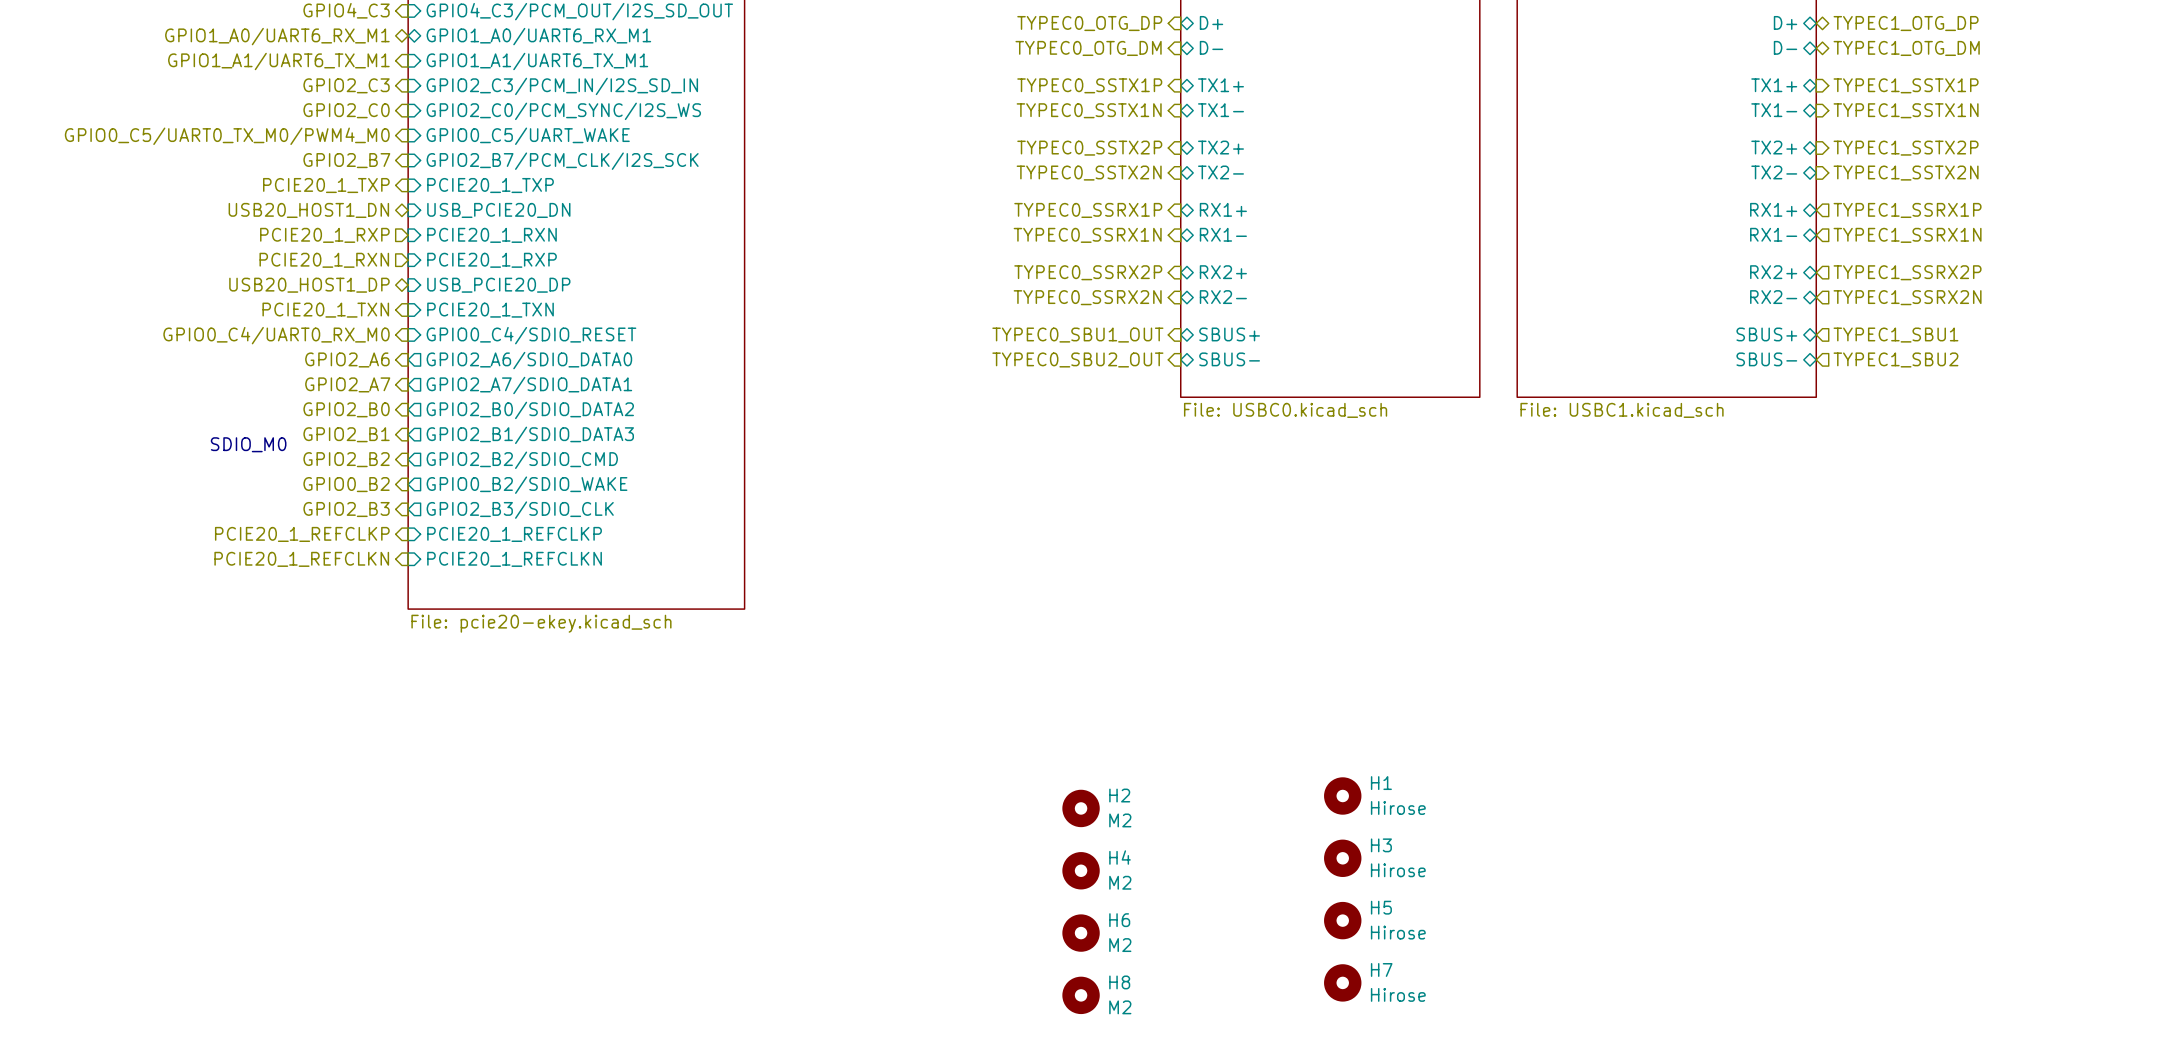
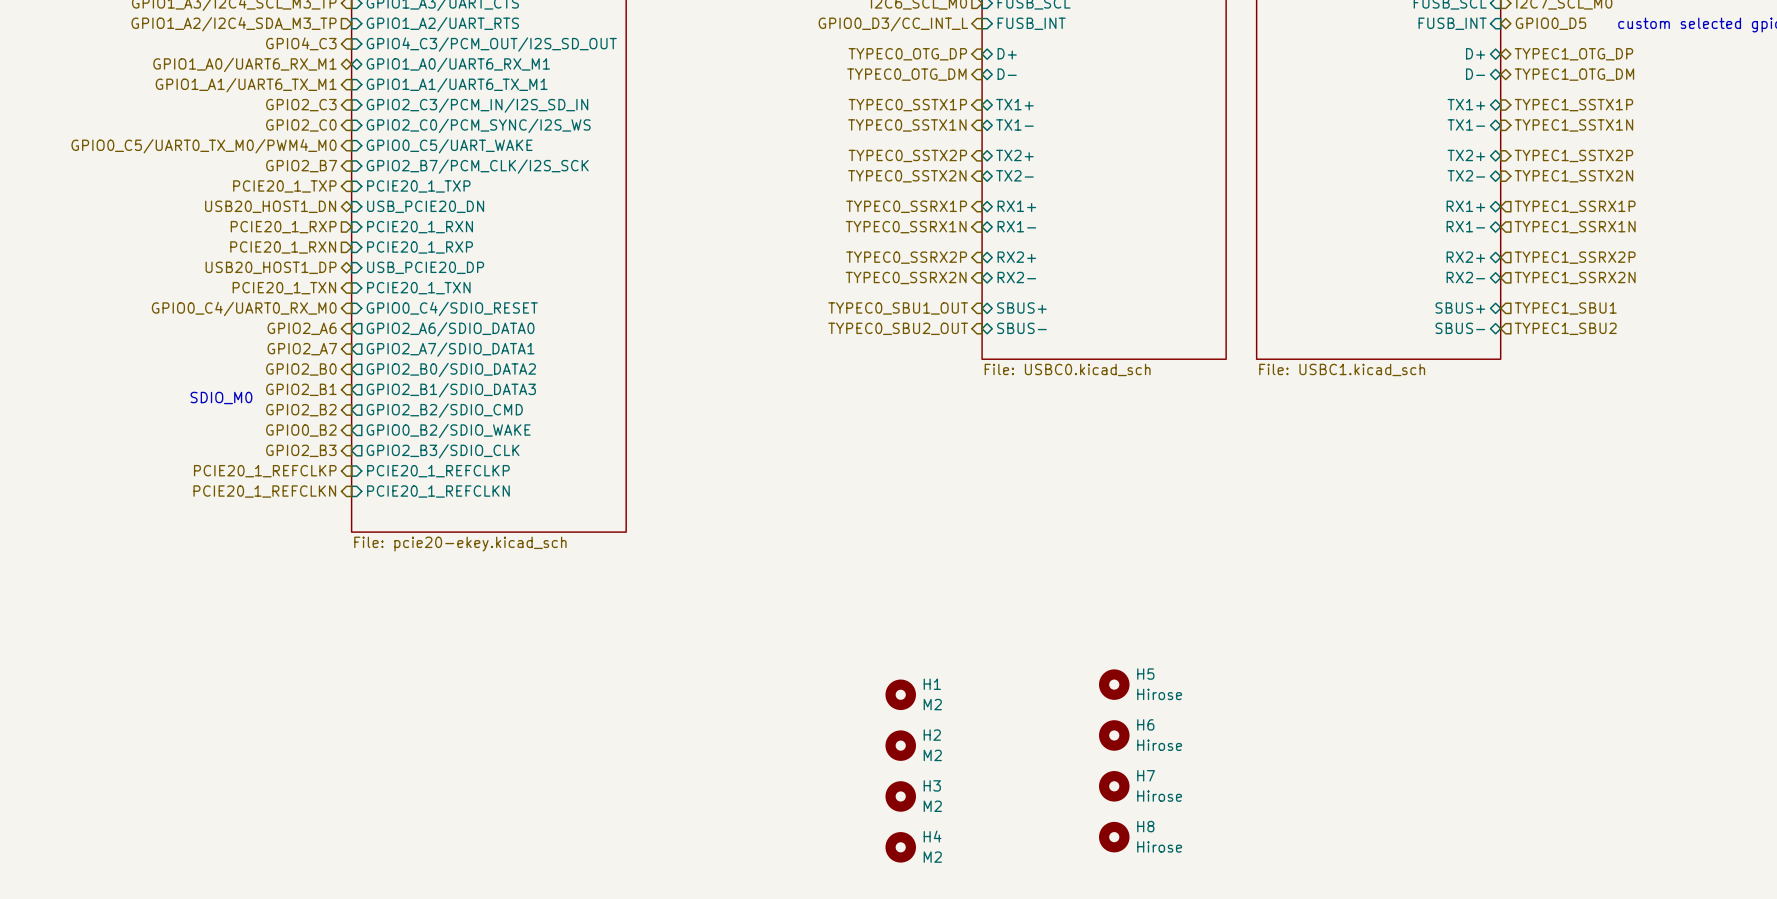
H1 name: H1 (1381, 783) -> H5 (1145, 674)
H2 name: H2 (1119, 795) -> H1 (932, 684)
H3 name: H3 (1381, 845) -> H6 (1145, 724)
H4 name: H4 (1120, 857) -> H2 (932, 735)
H5 name: H5 (1381, 907) -> H7 (1146, 775)
H6 name: H6 (1119, 920) -> H3 (932, 785)
H7 name: H7 (1381, 969) -> H8 (1145, 826)
H8 name: H8 (1119, 982) -> H4 (932, 836)

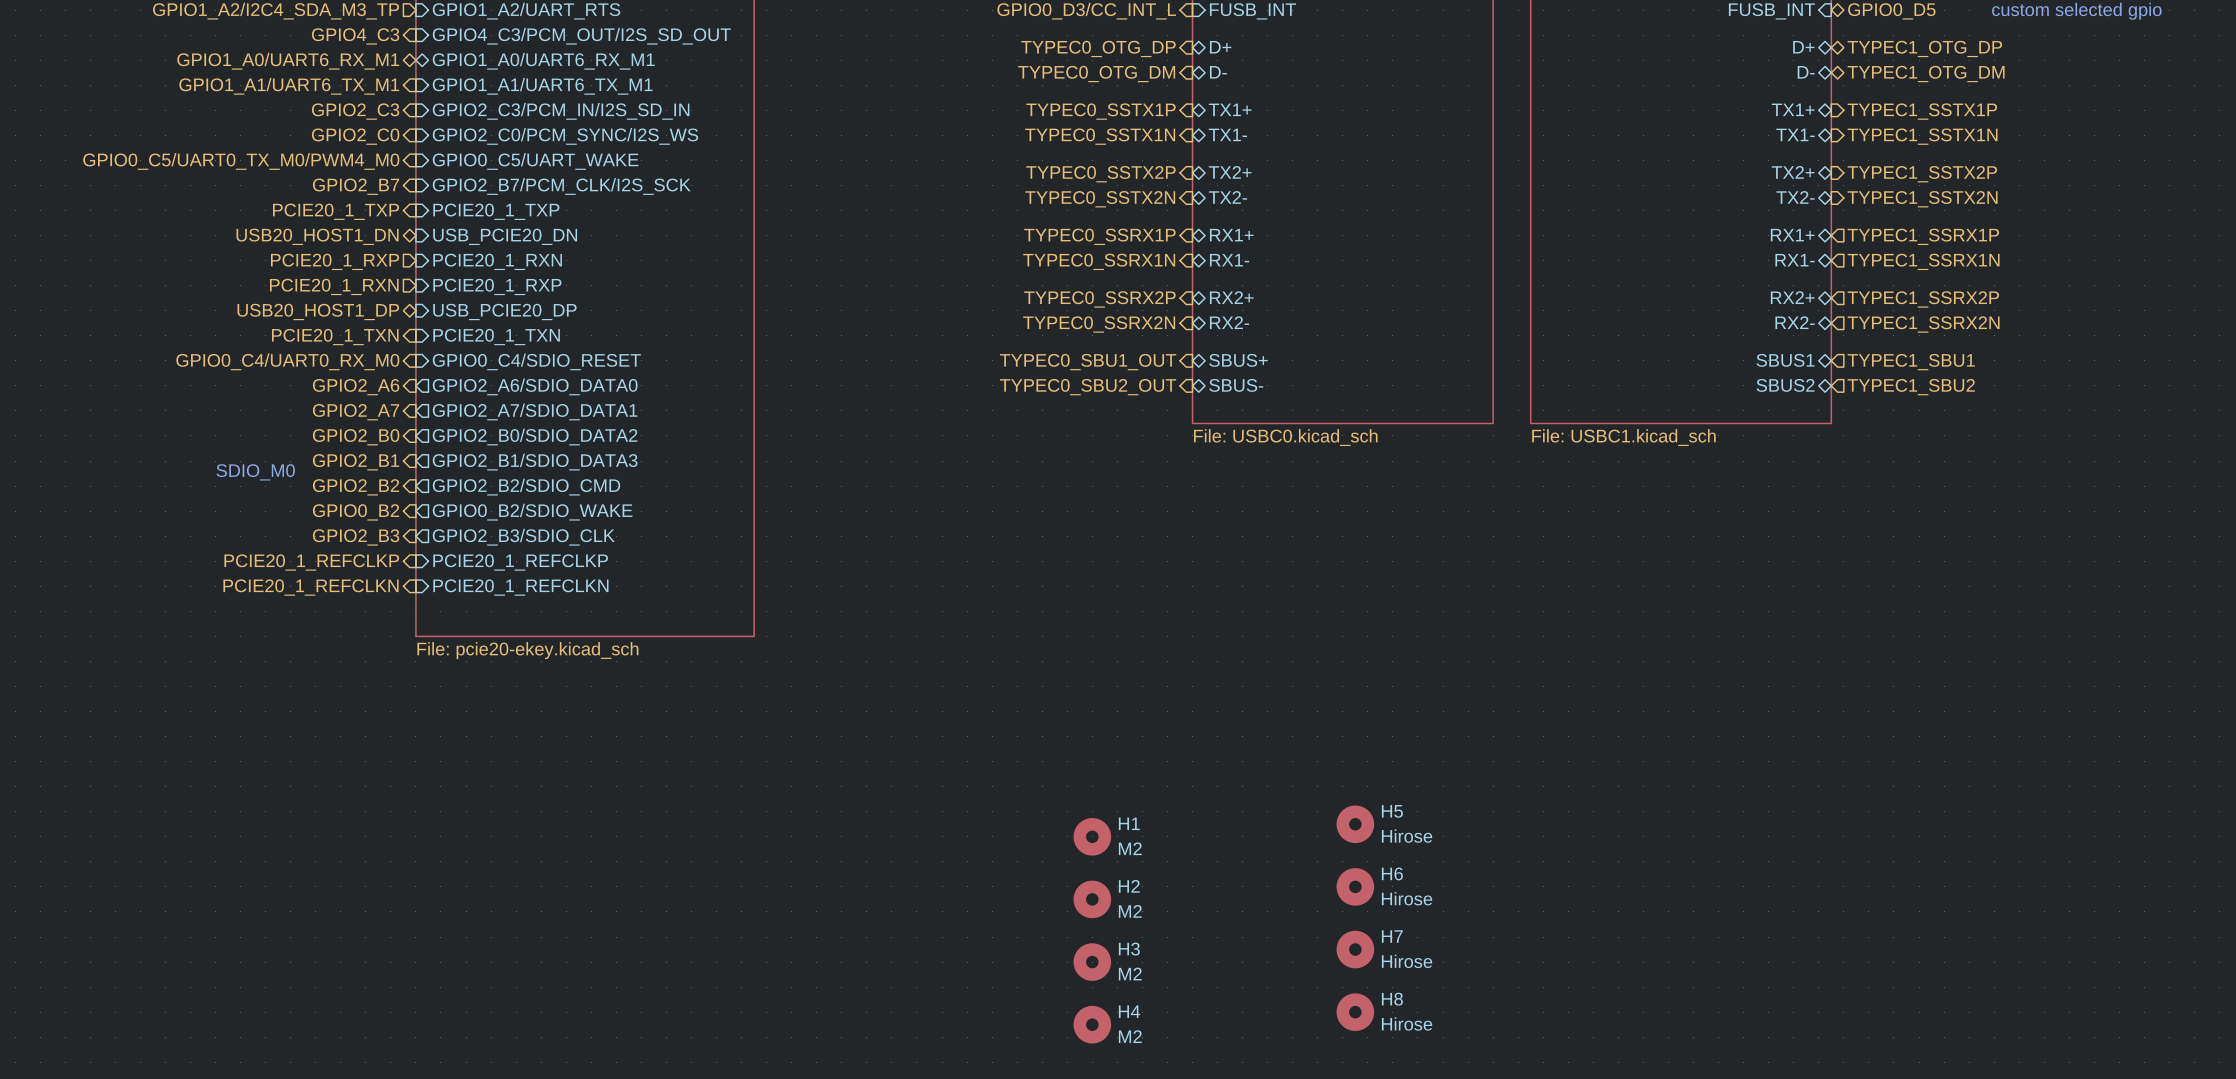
sheet pin: SBUS+ (1460, 307) -> SBUS1 (1785, 360)
sheet pin: SBUS- (1460, 328) -> SBUS2 (1785, 385)

